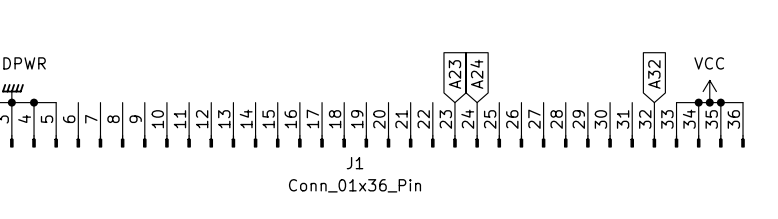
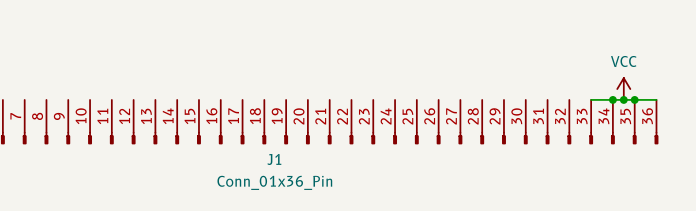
global label: A23 (454, 74) -> none
global label: A24 (476, 74) -> none
global label: A32 (654, 74) -> none

